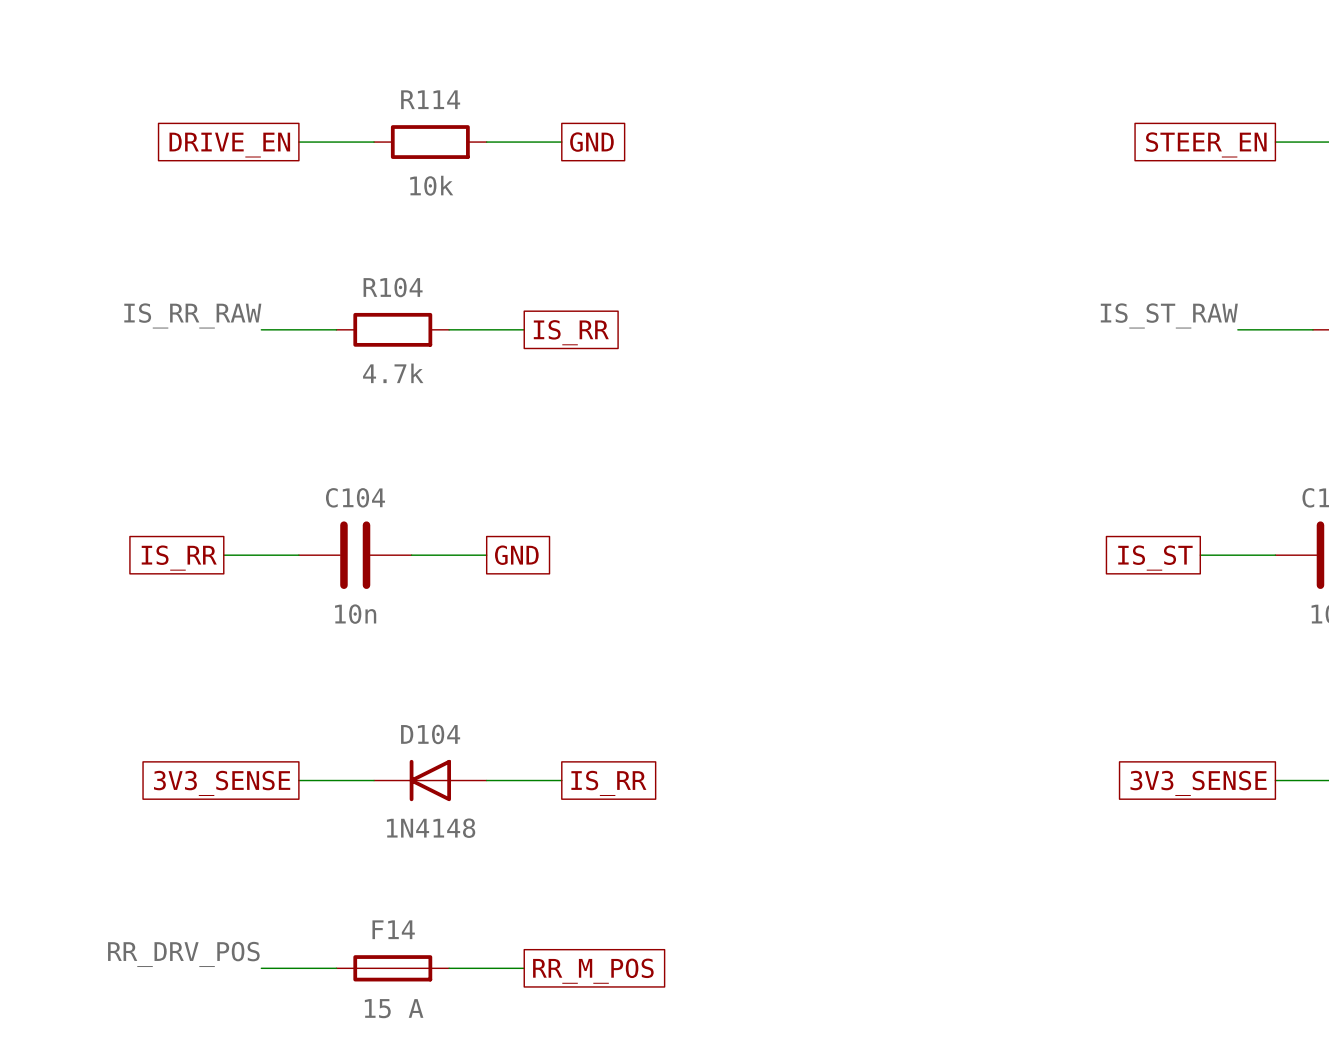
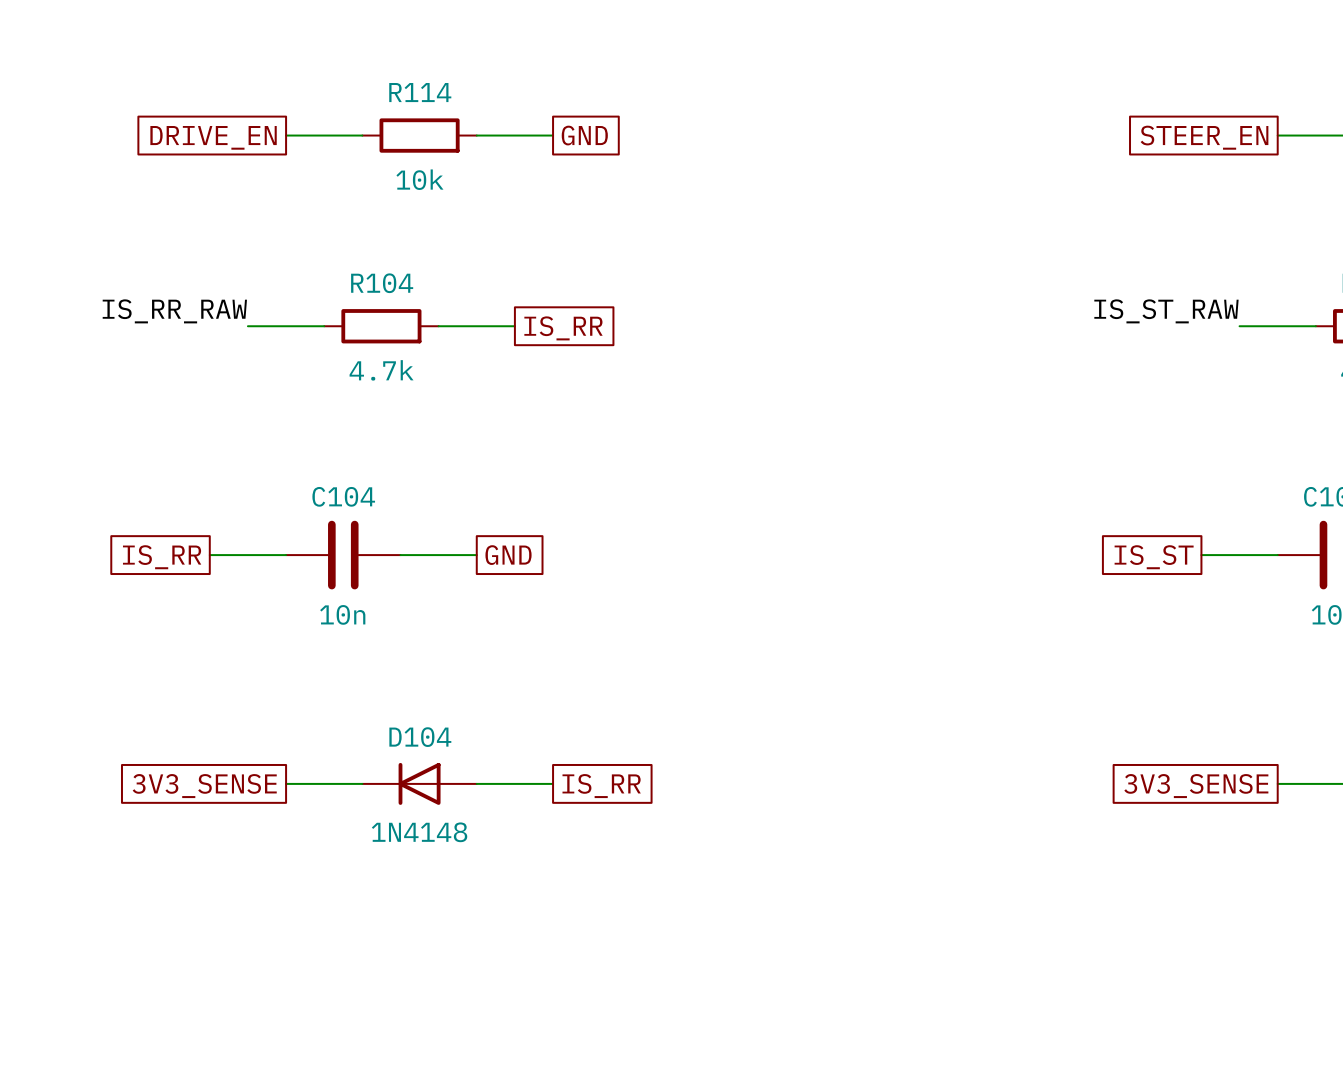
label: RR_DRV_POS (183, 954) -> none
wire: (261, 968) (336, 968) -> none
F14: 15 A (392, 968) -> none
wire: (449, 968) (524, 968) -> none
global label: RR_M_POS (593, 971) -> none

